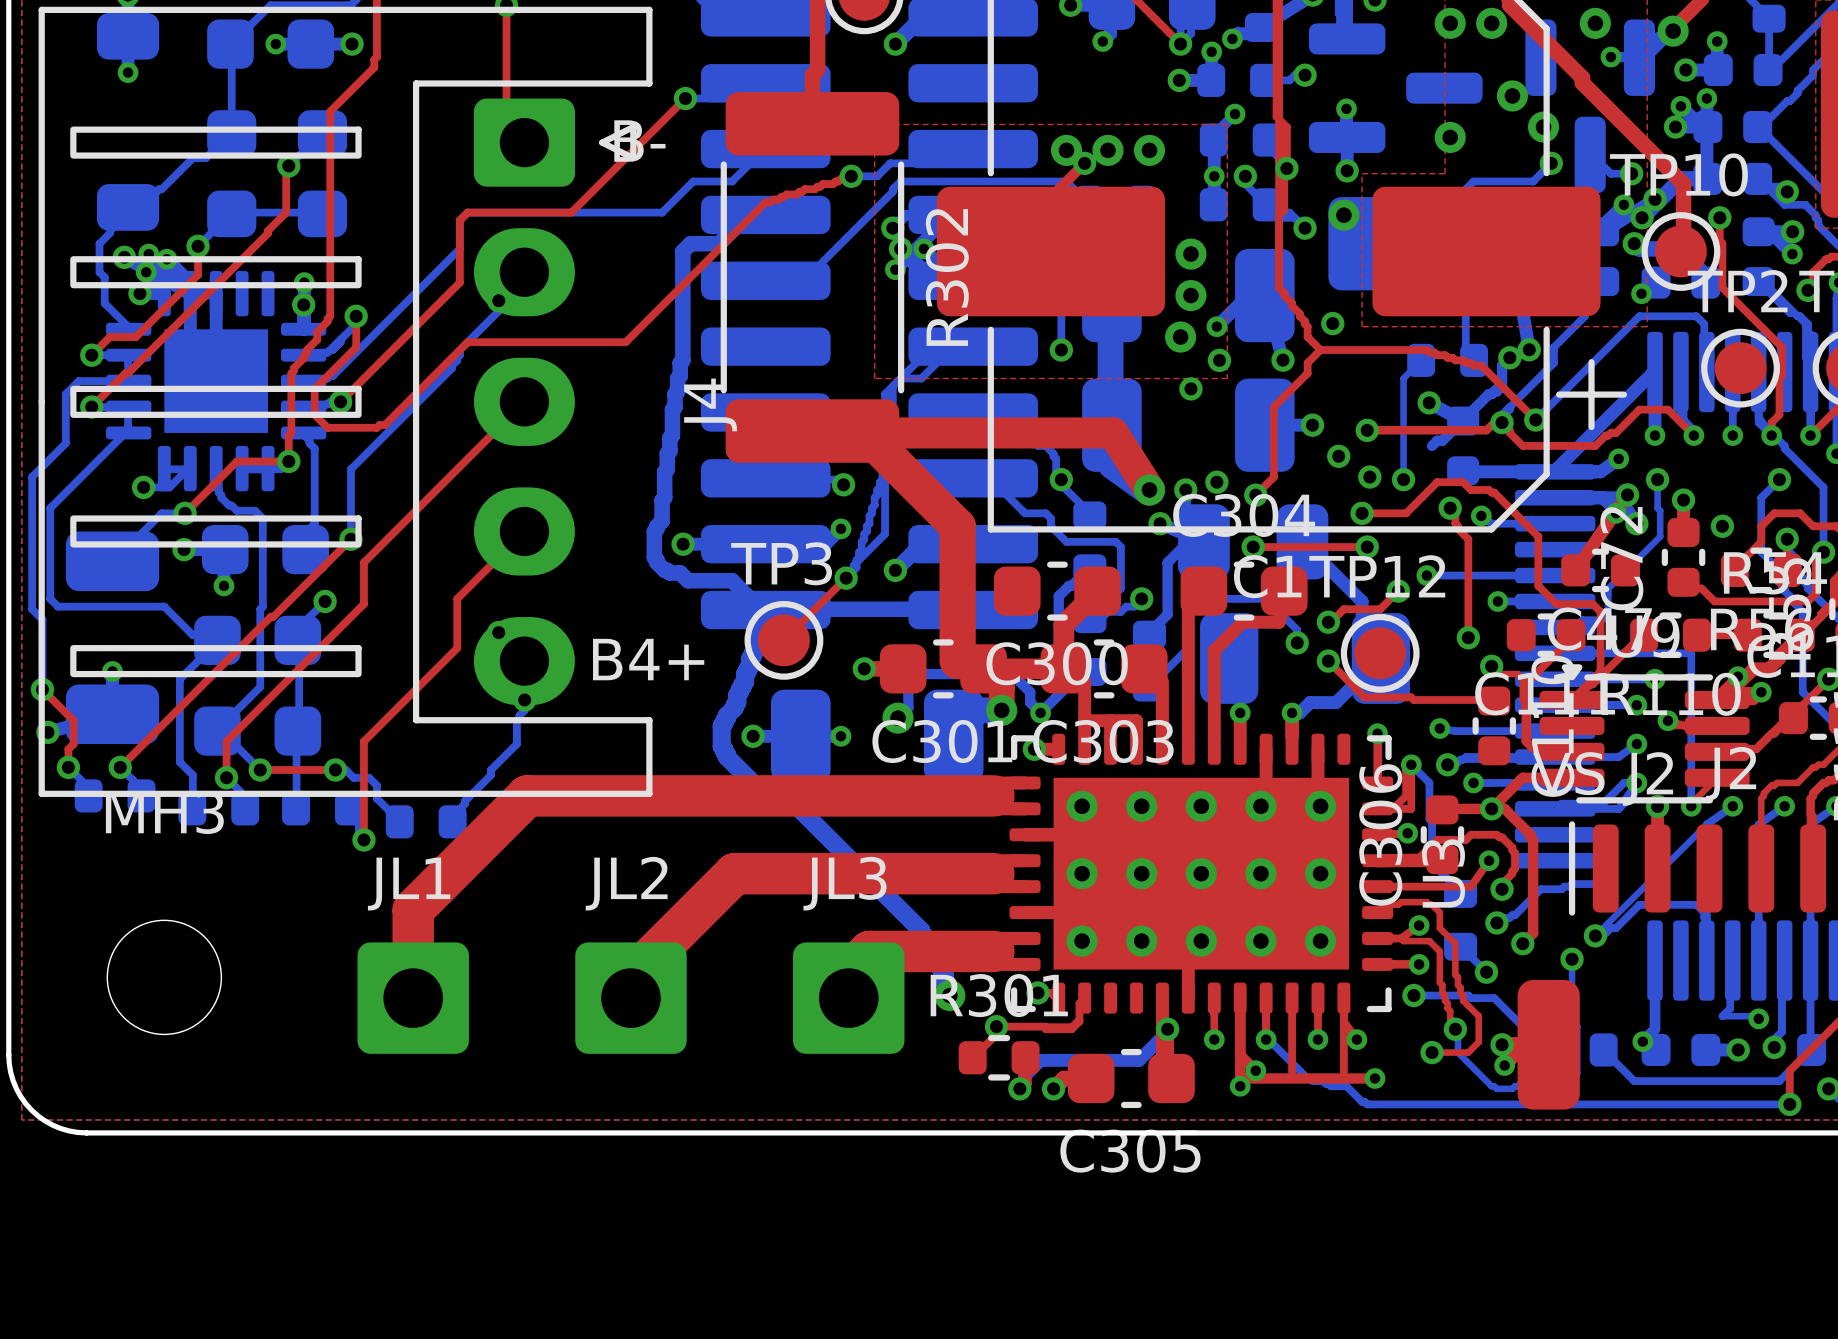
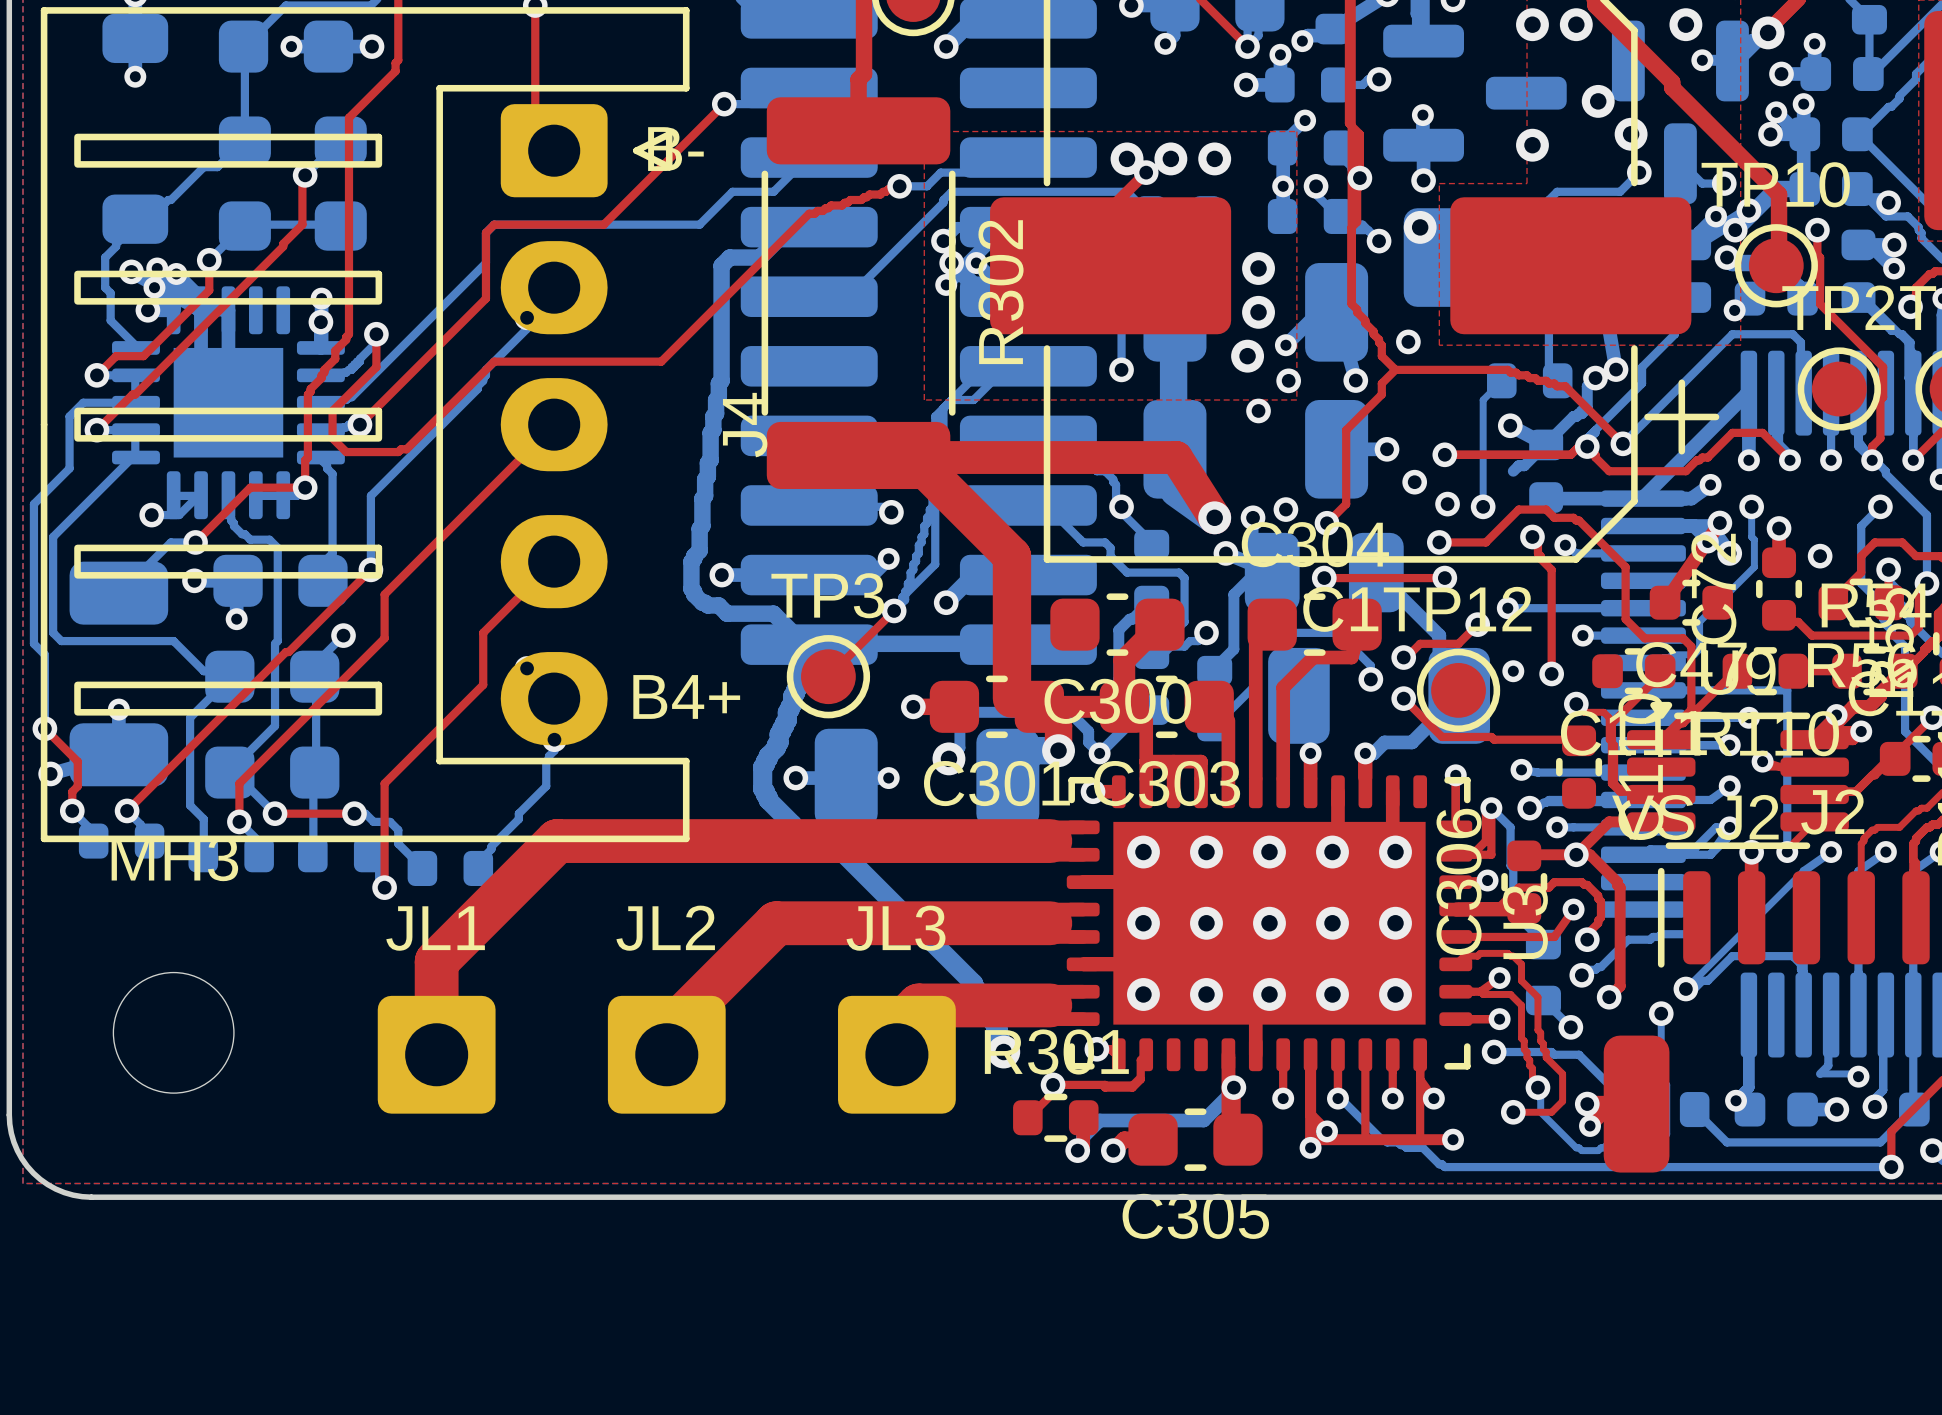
via: none -> (1513, 671)

